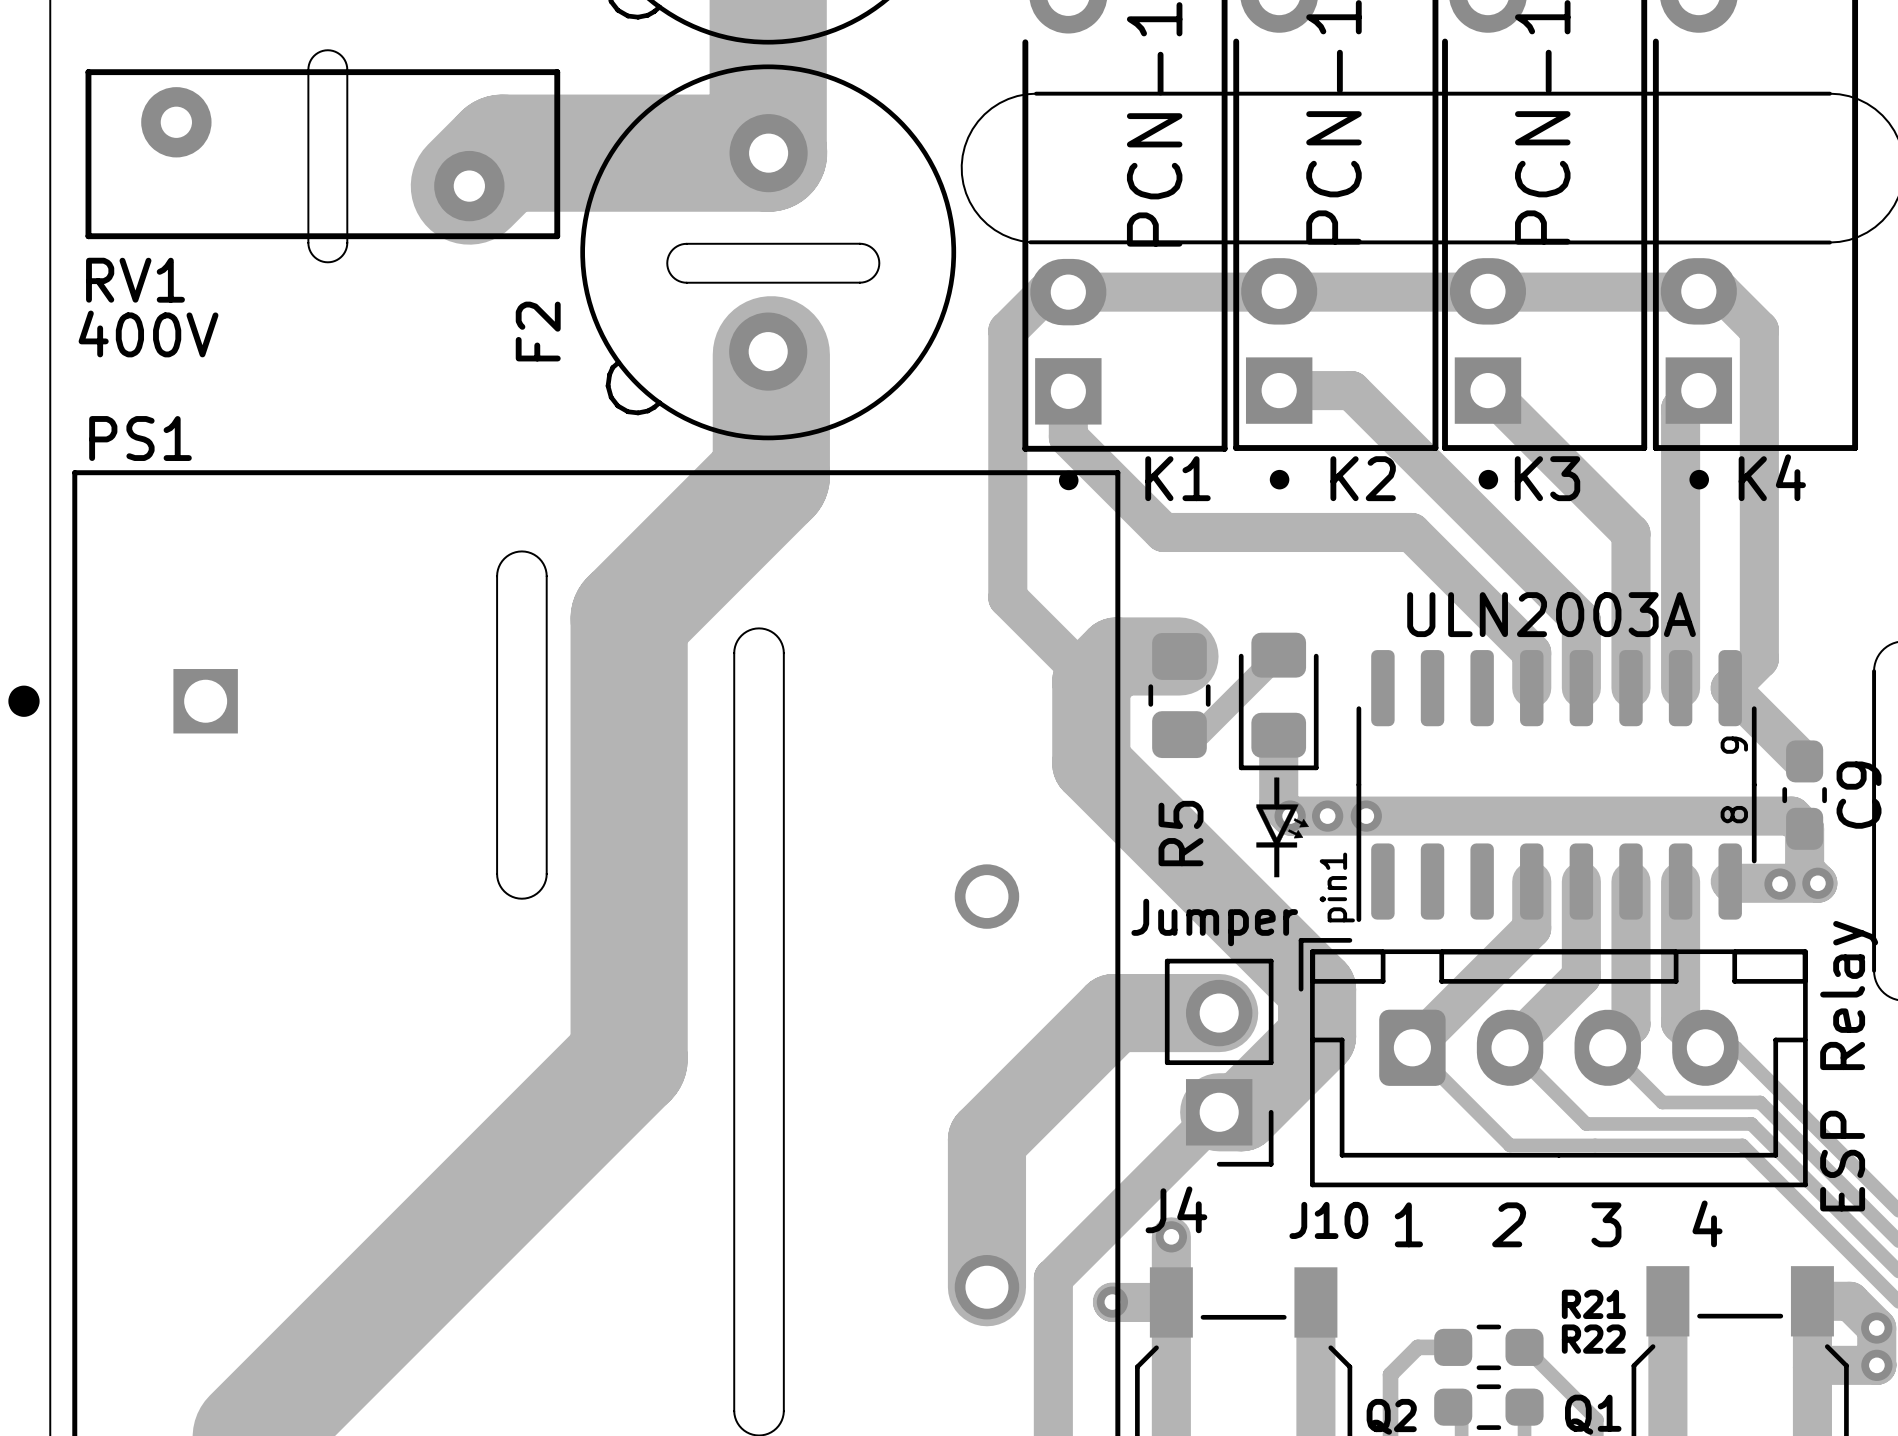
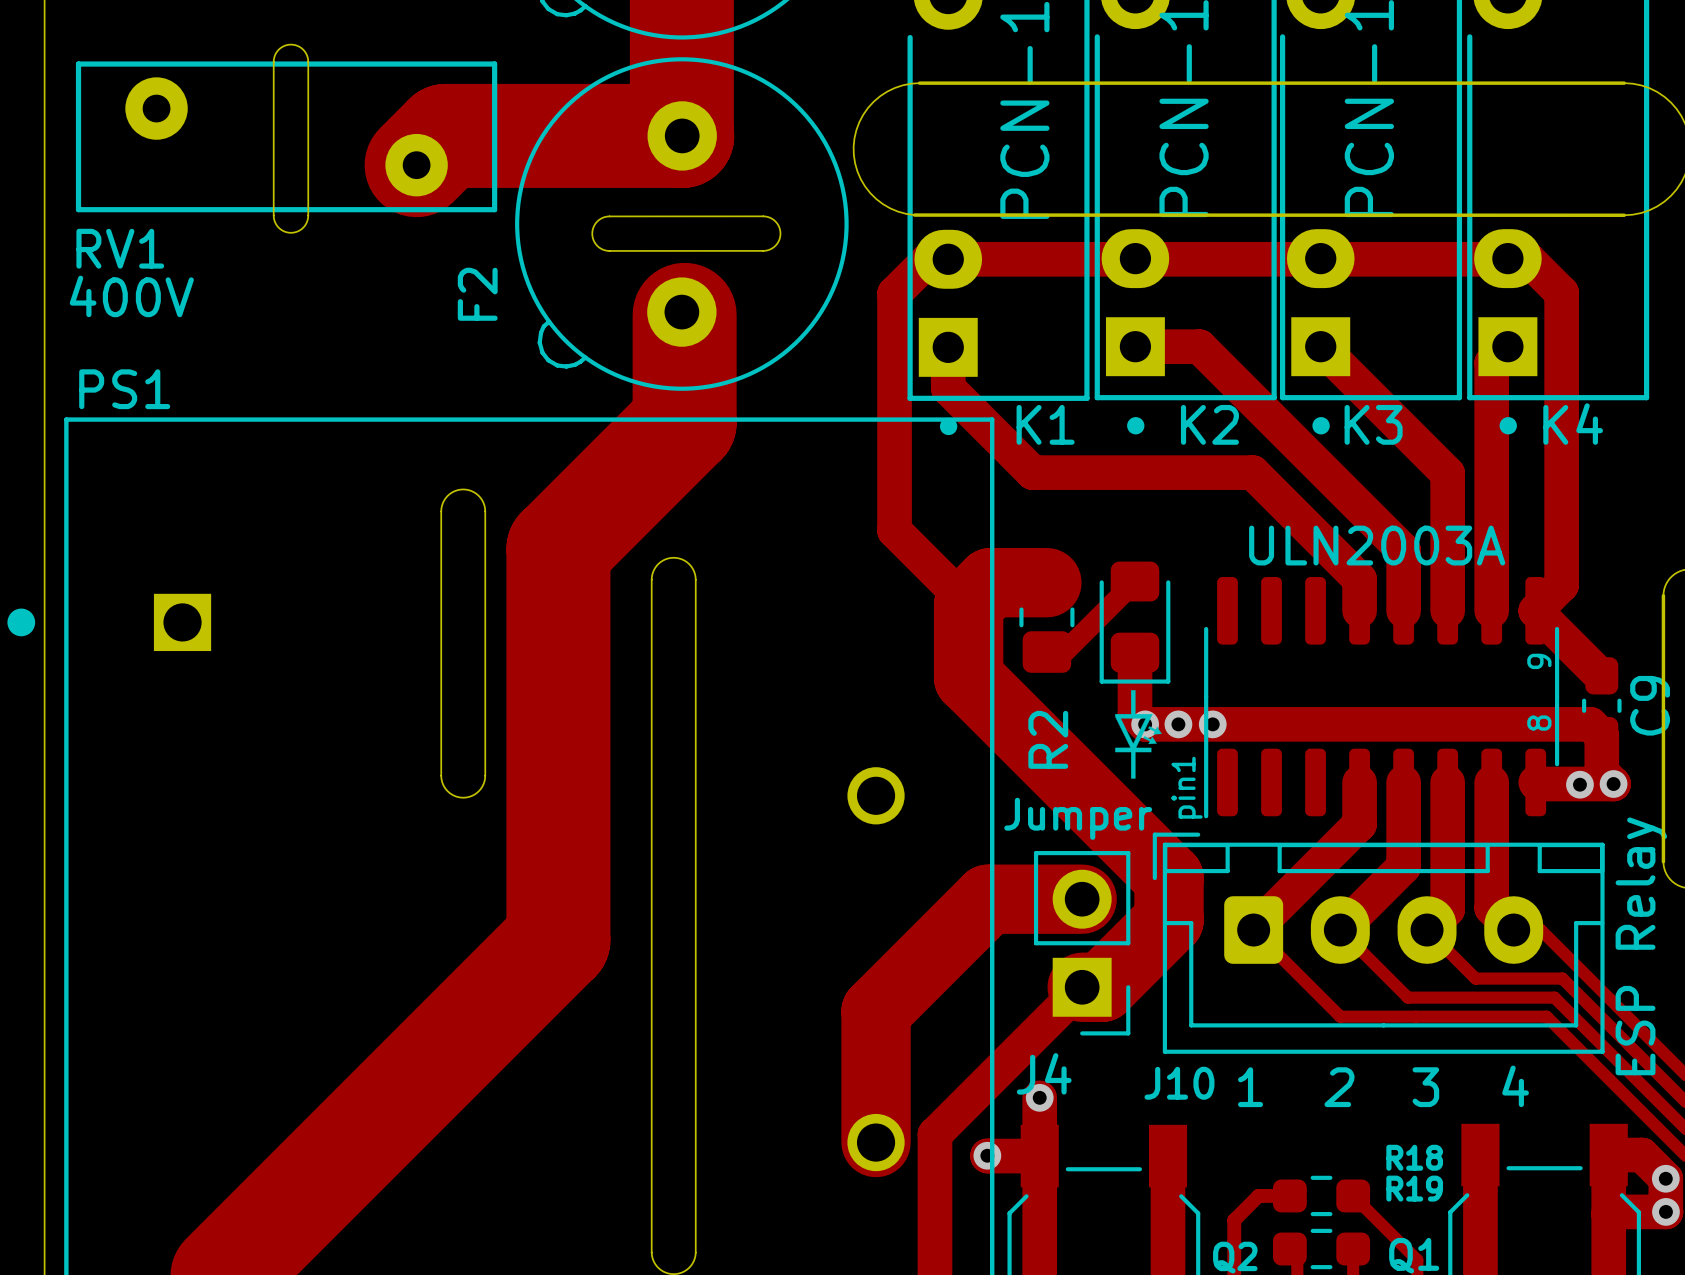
R5 name: R5 (1181, 833) -> R2 (1048, 739)
R21 name: R21 (1593, 1304) -> R18 (1414, 1157)
R22 name: R22 (1593, 1339) -> R19 (1414, 1188)

